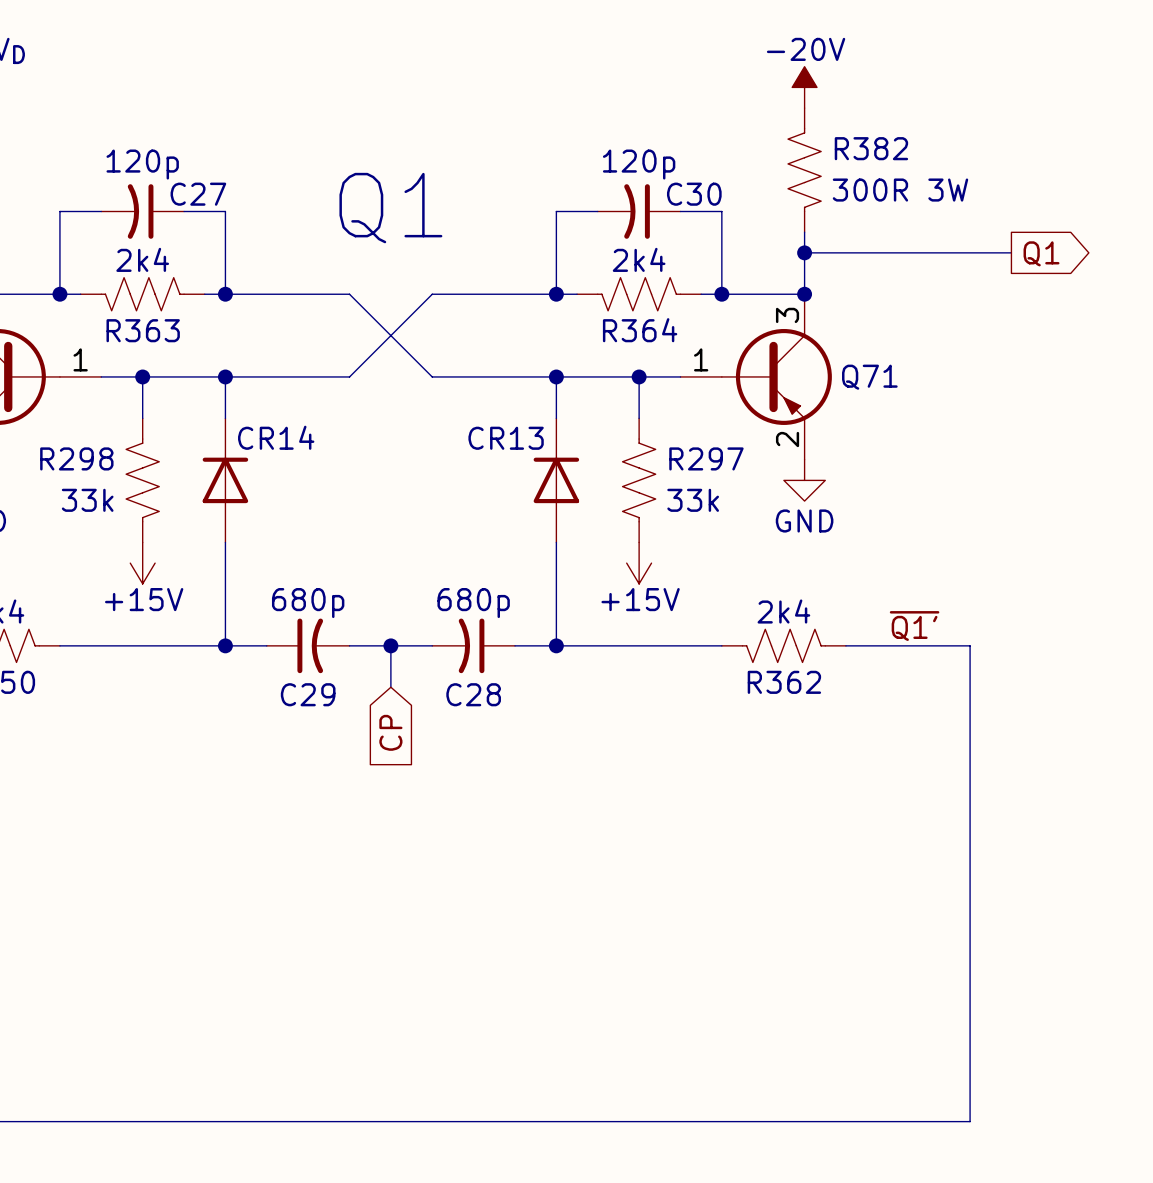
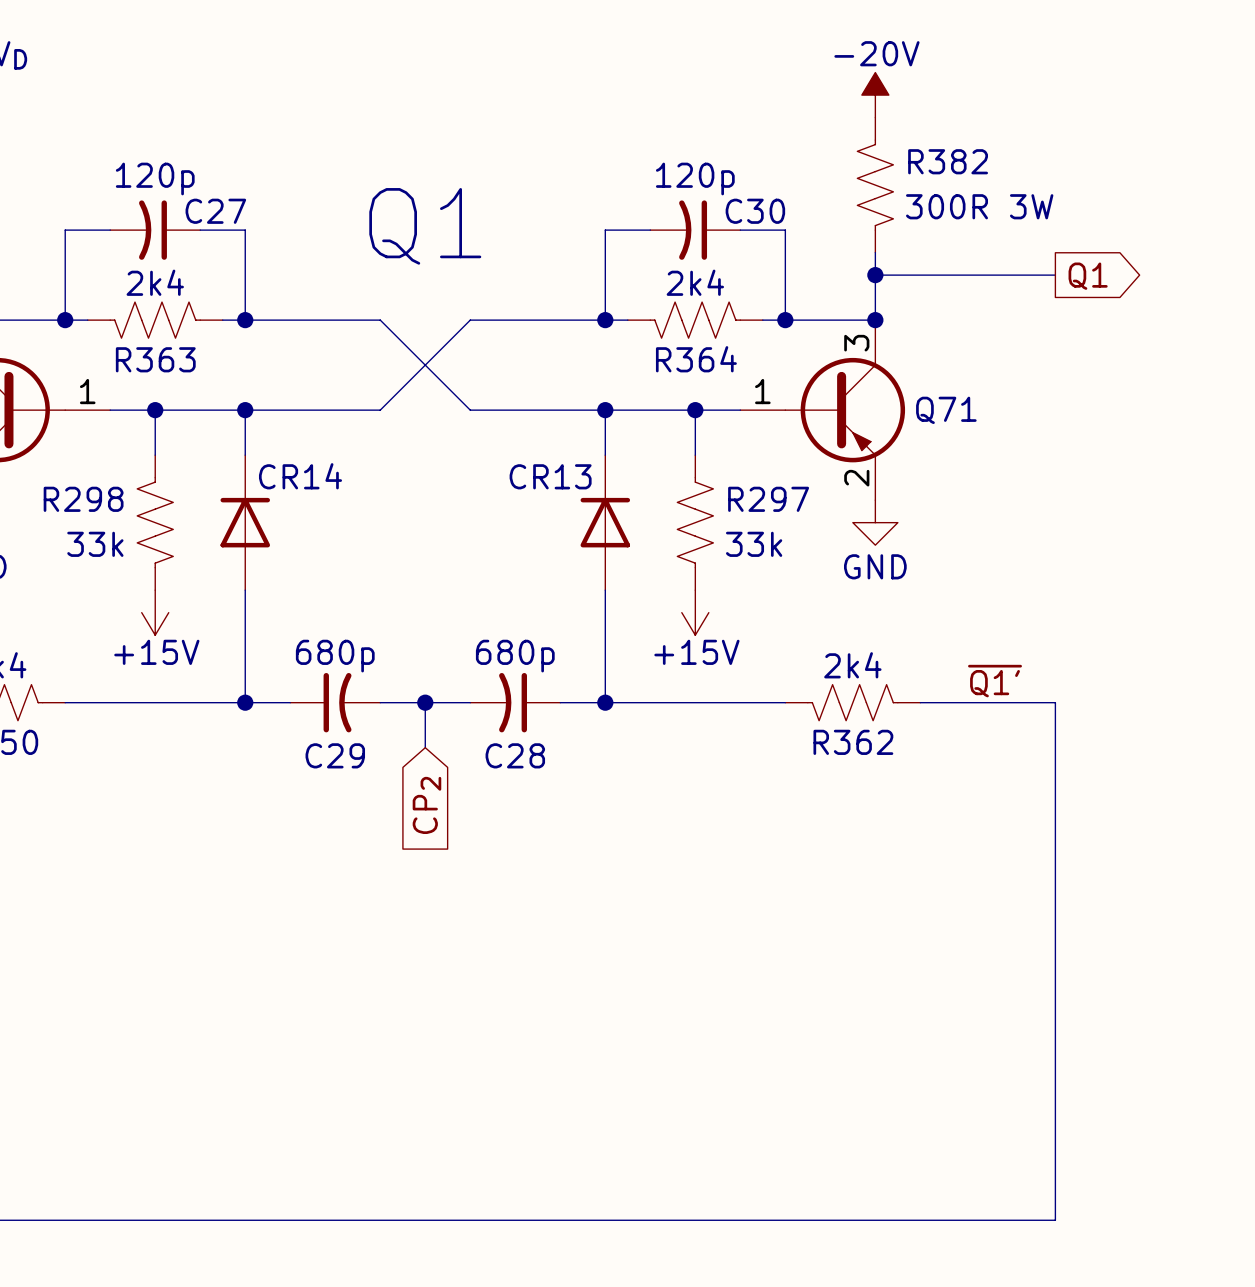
wire: (970, 252) (1011, 252) -> none
global label position: Q1 (1041, 253) -> Q1 (1088, 276)
global label: CP (390, 732) -> CP2 (426, 805)

